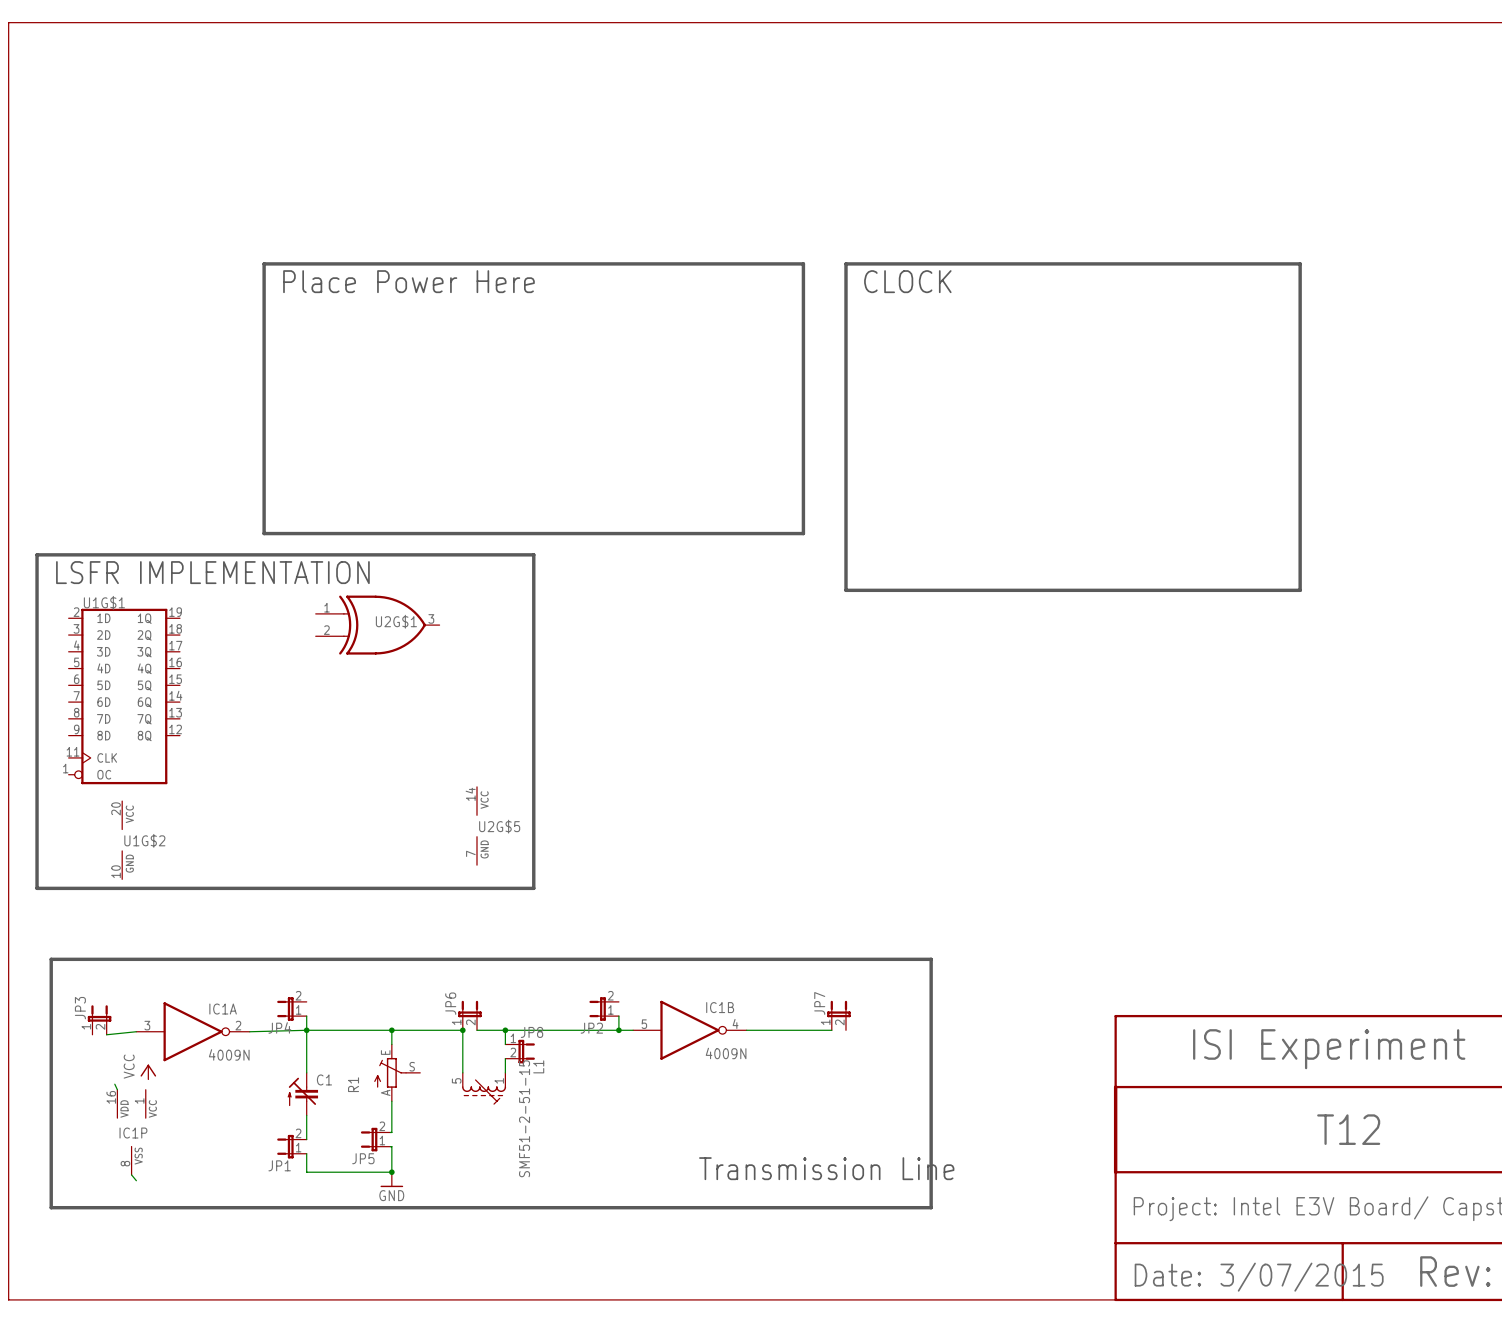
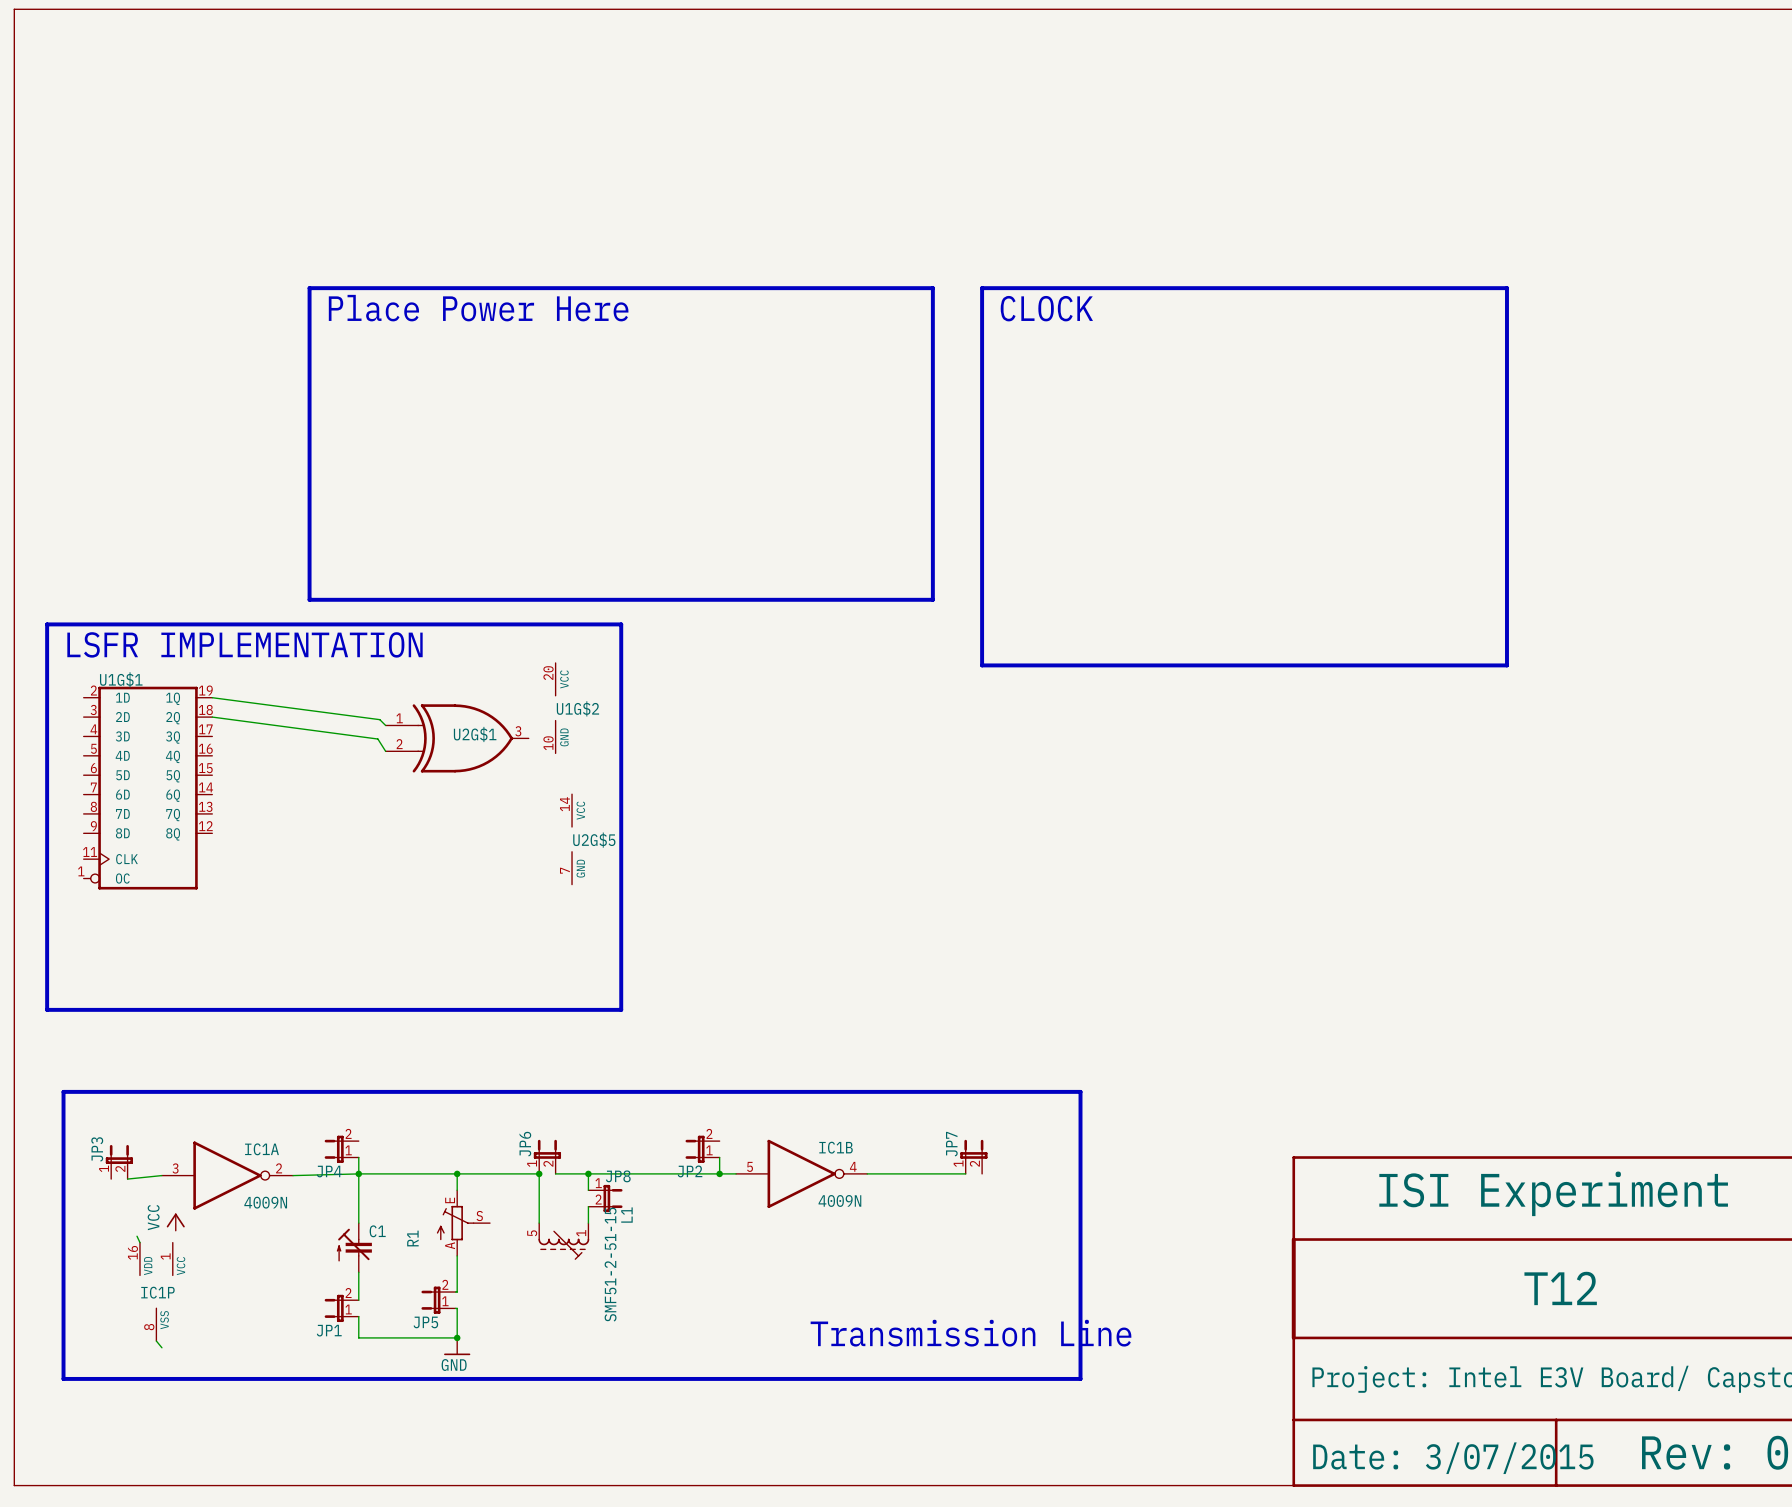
wire: none -> (212, 697) (379, 719) (385, 725)
U2G$1 position: (377, 625) -> (457, 738)
wire: none -> (212, 717) (377, 739) (385, 751)
U2G$5 position: (477, 826) -> (572, 839)
U1G$2 position: (122, 840) -> (555, 708)

